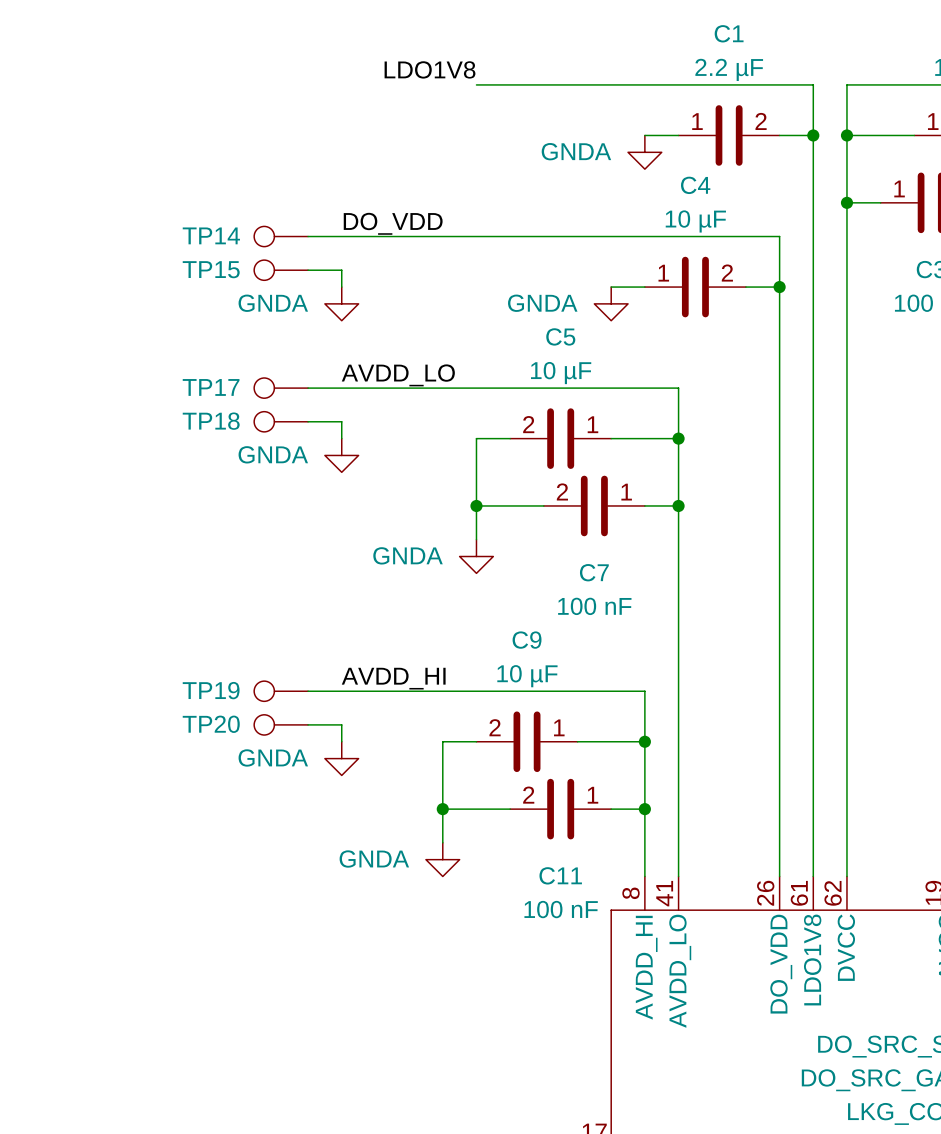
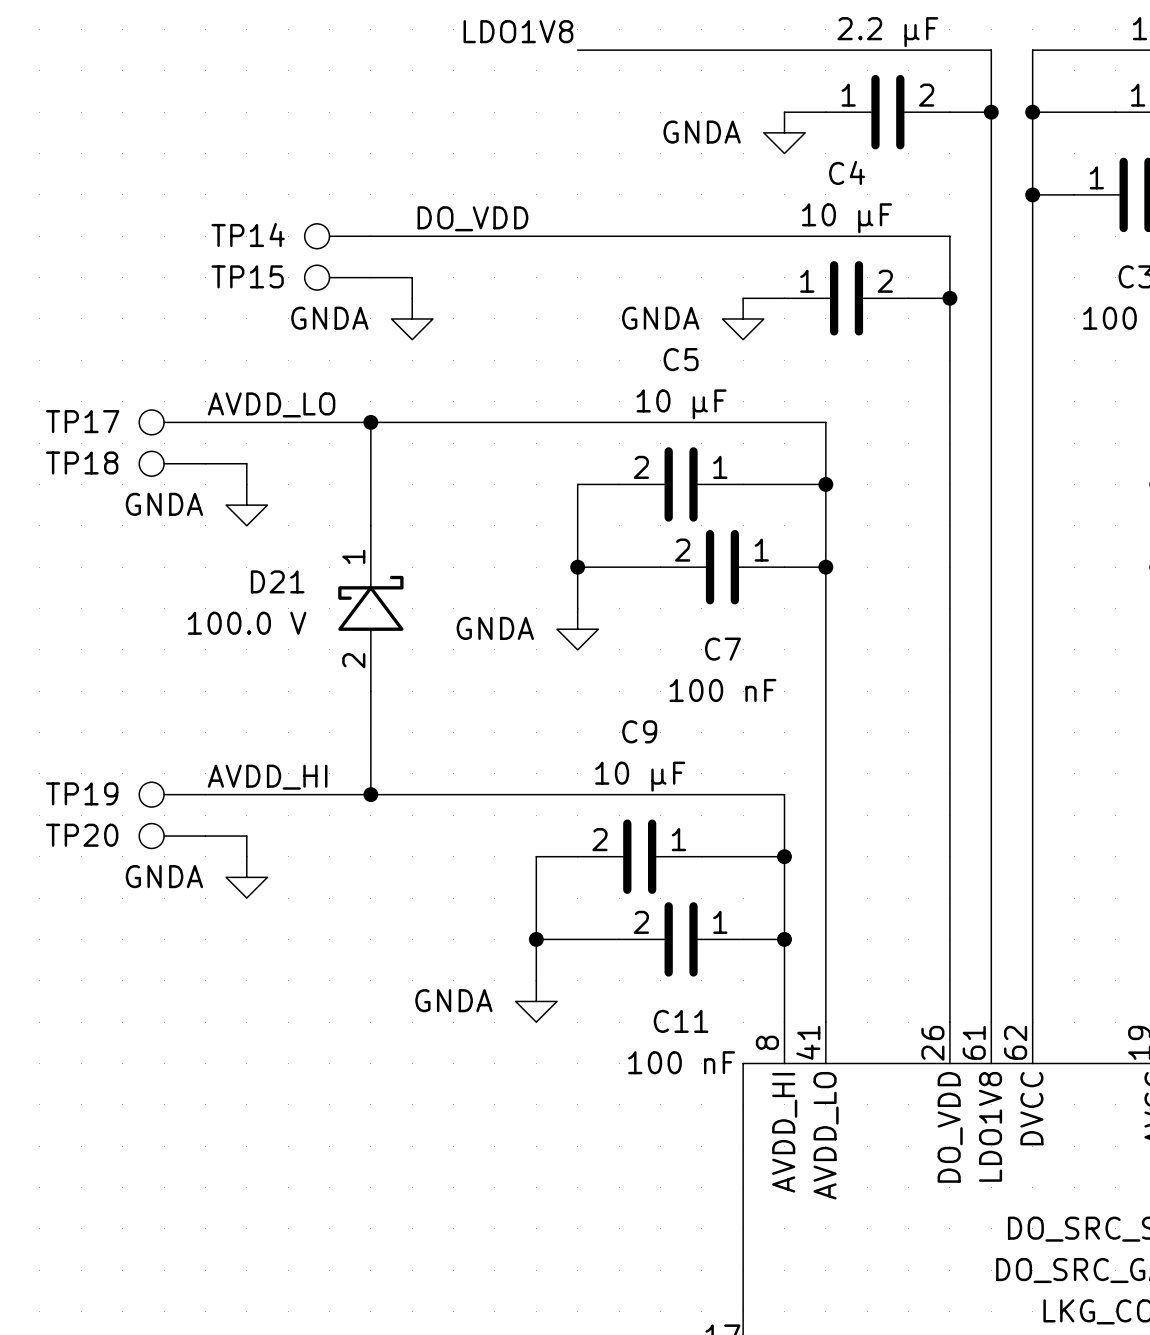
label position: AVDD_LO (398, 375) -> AVDD_LO (271, 404)
wire: none -> (205, 422) (370, 422) (370, 525)
TP17 position: (281, 388) -> (172, 422)
junction: none -> (370, 422)
TP18 position: (281, 421) -> (172, 463)
wire: (308, 421) (341, 421) (341, 438) -> (205, 463) (246, 463) (246, 484)
power symbol position: GNDA (341, 455) -> GNDA (246, 505)
D21: none -> 100.0 V (370, 608)
wire: none -> (370, 691) (370, 794) (205, 794)
label position: AVDD_HI (393, 678) -> AVDD_HI (267, 777)
TP19 position: (281, 691) -> (172, 794)
junction: none -> (370, 794)
TP20 position: (281, 724) -> (172, 836)
wire: (308, 724) (341, 724) (341, 741) -> (205, 836) (246, 836) (246, 856)
power symbol position: GNDA (341, 758) -> GNDA (246, 877)

